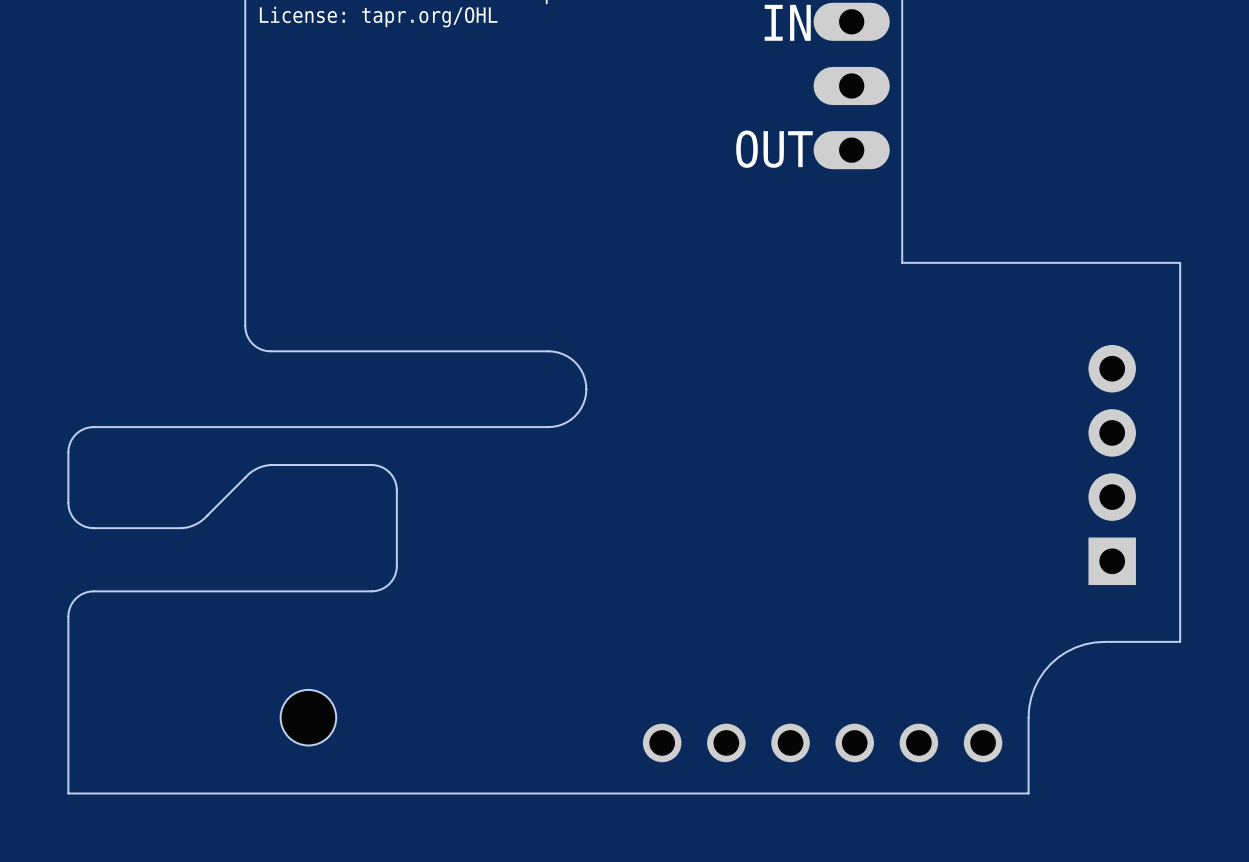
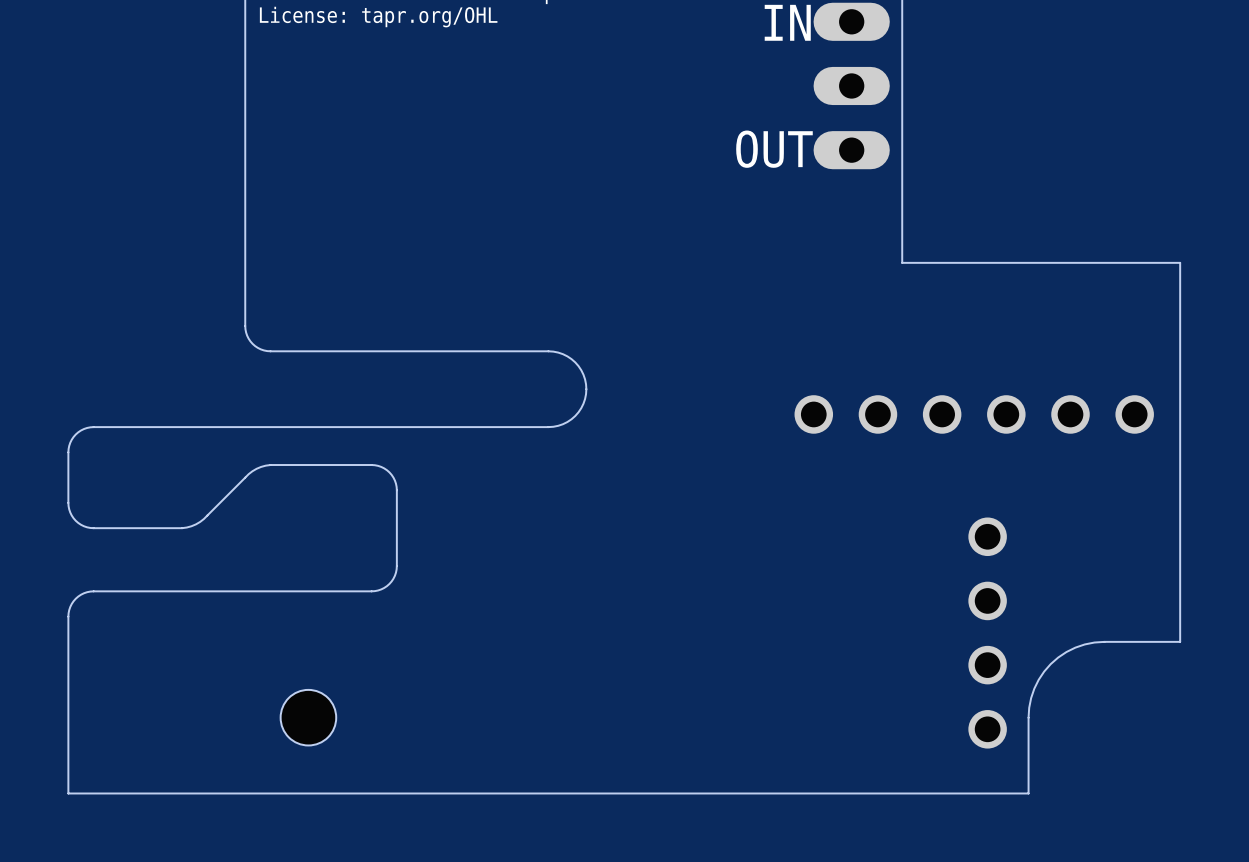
part: (1112, 465) -> none
part: none -> (987, 633)
part position: (822, 742) -> (974, 414)

